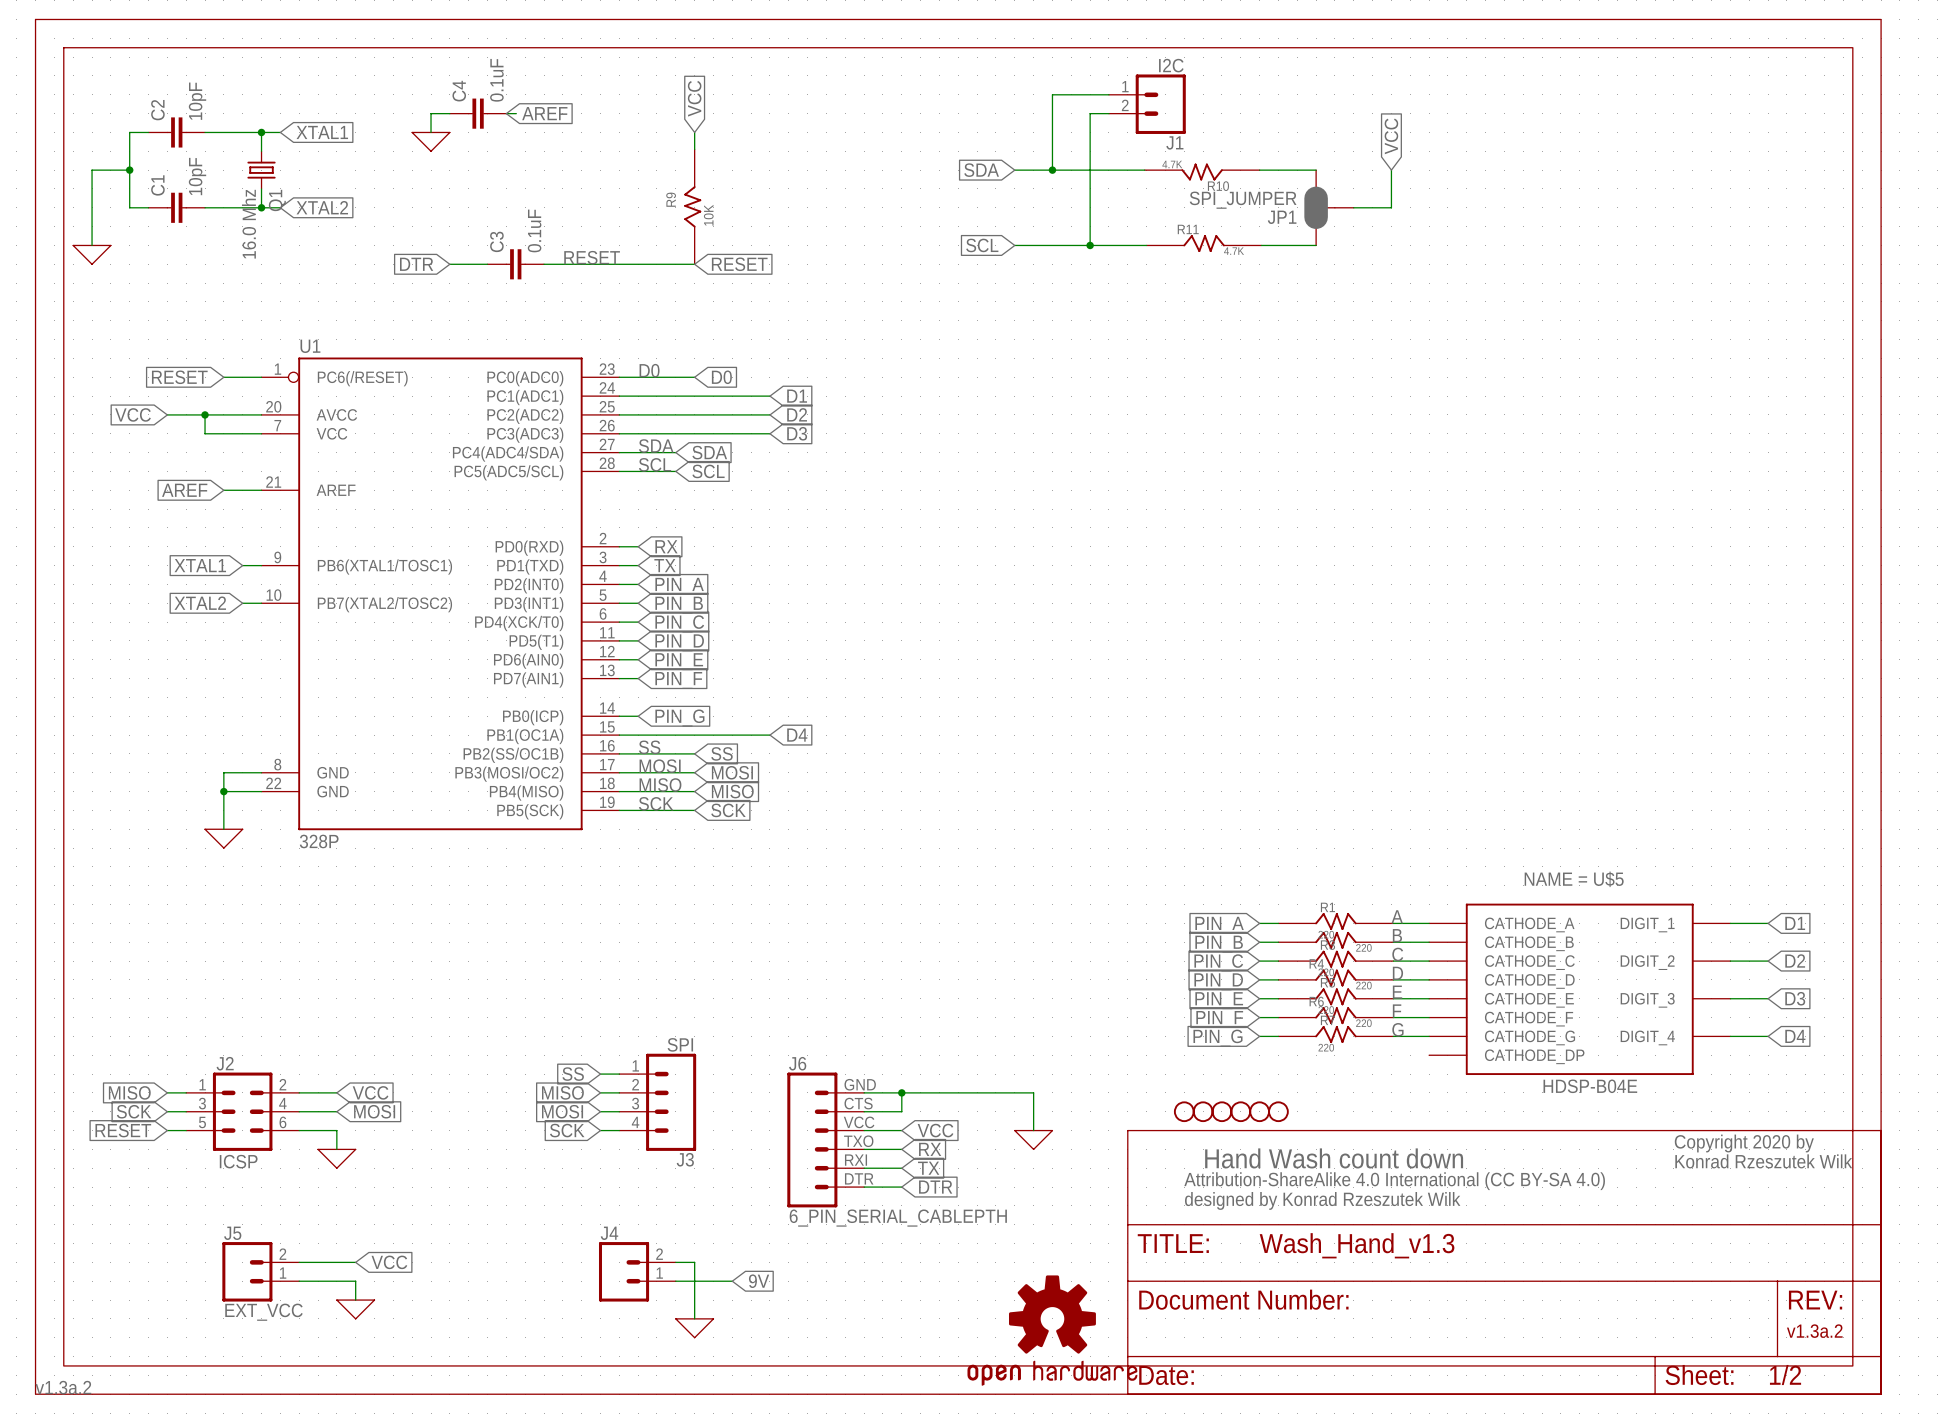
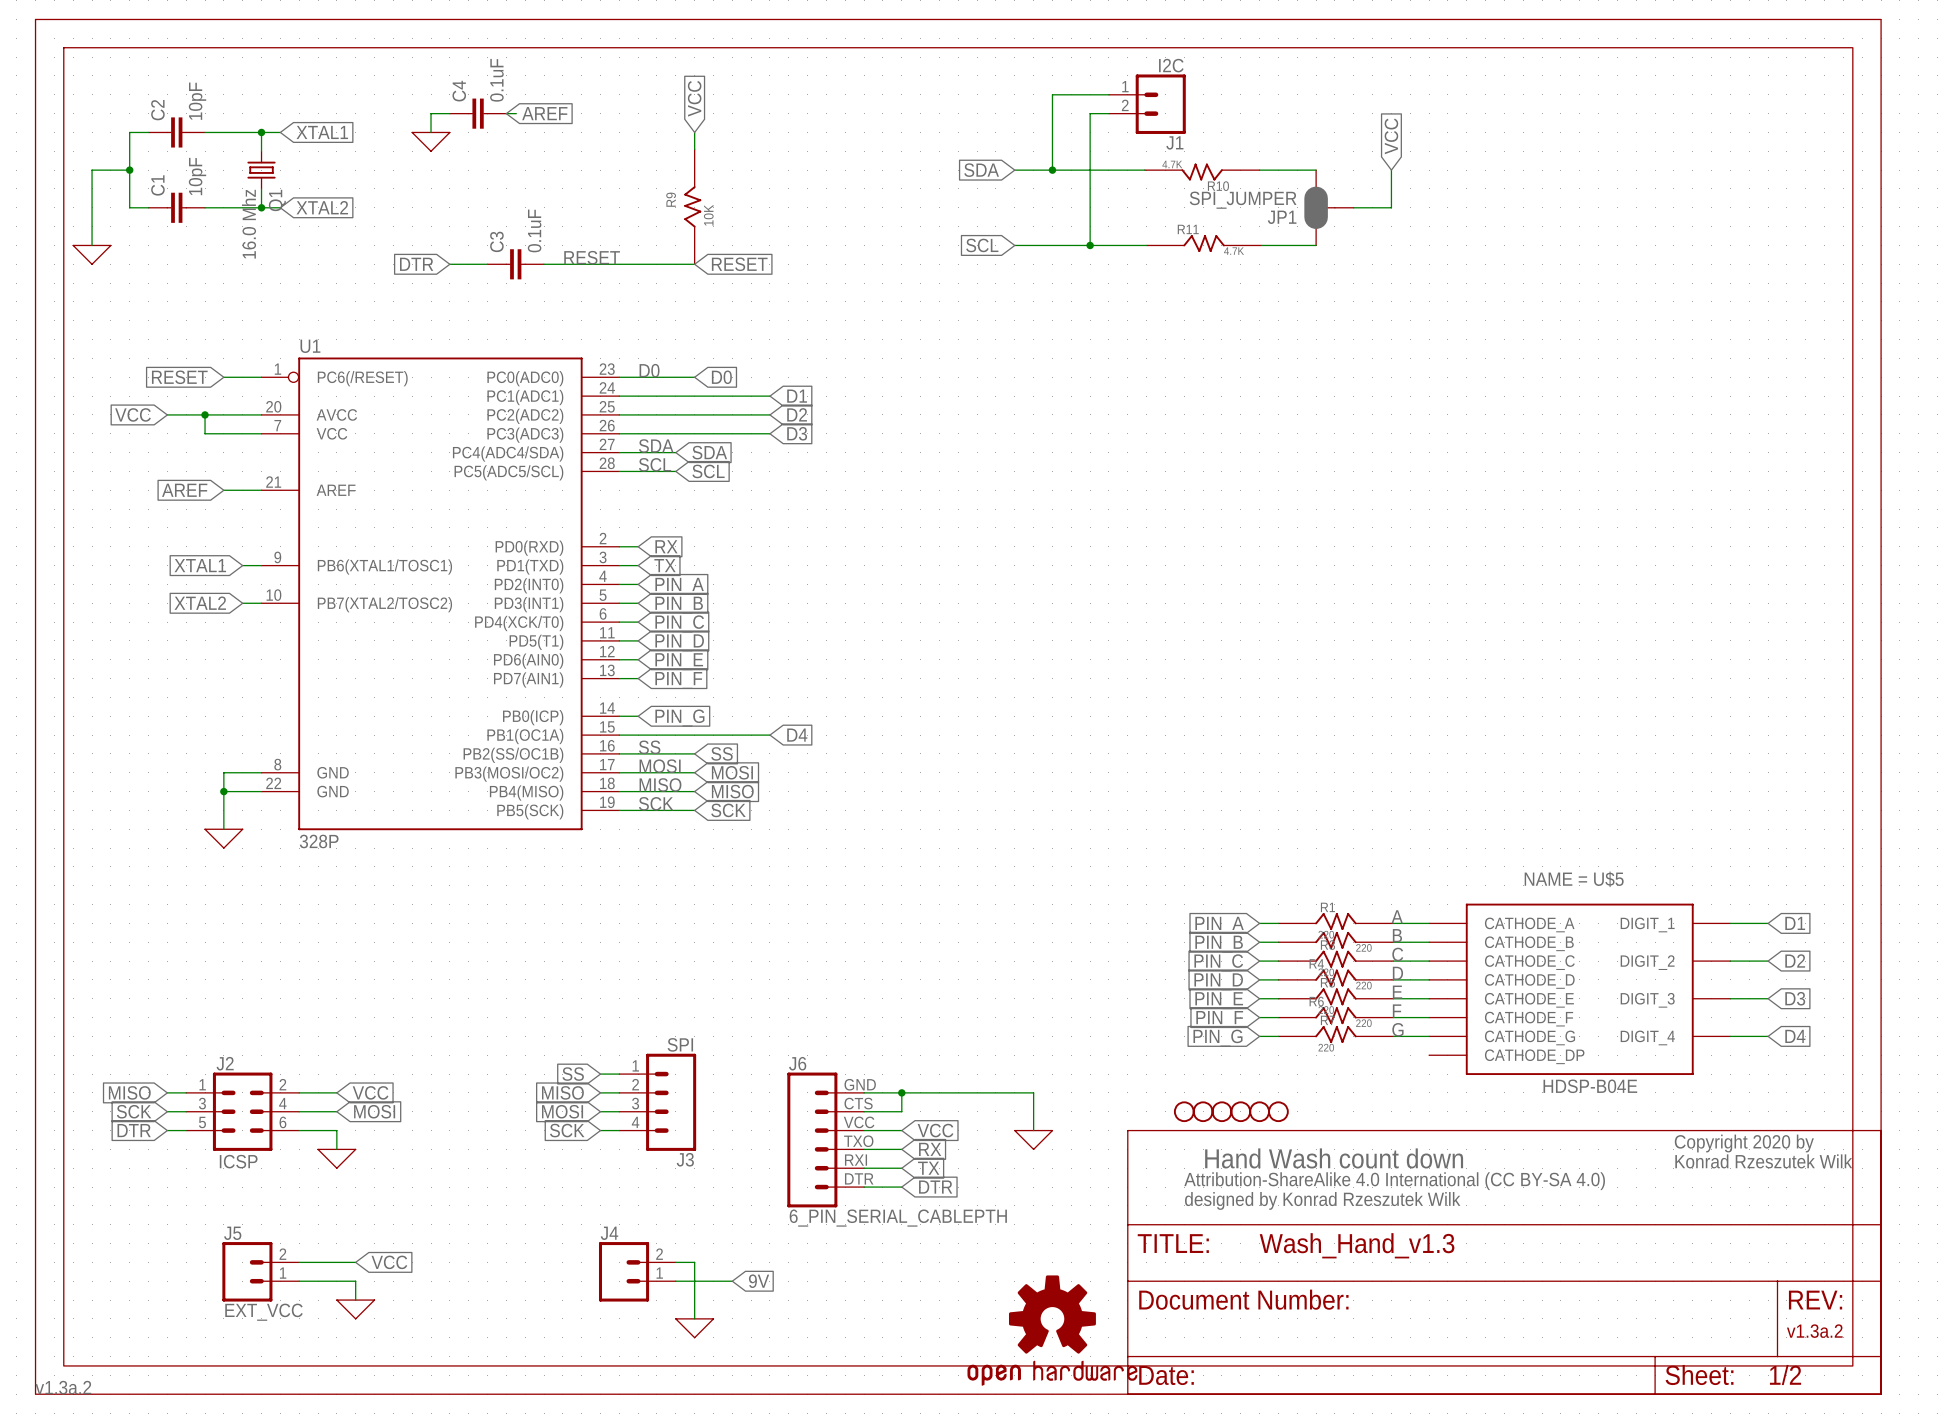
global label: RESET (123, 1130) -> DTR (134, 1130)

